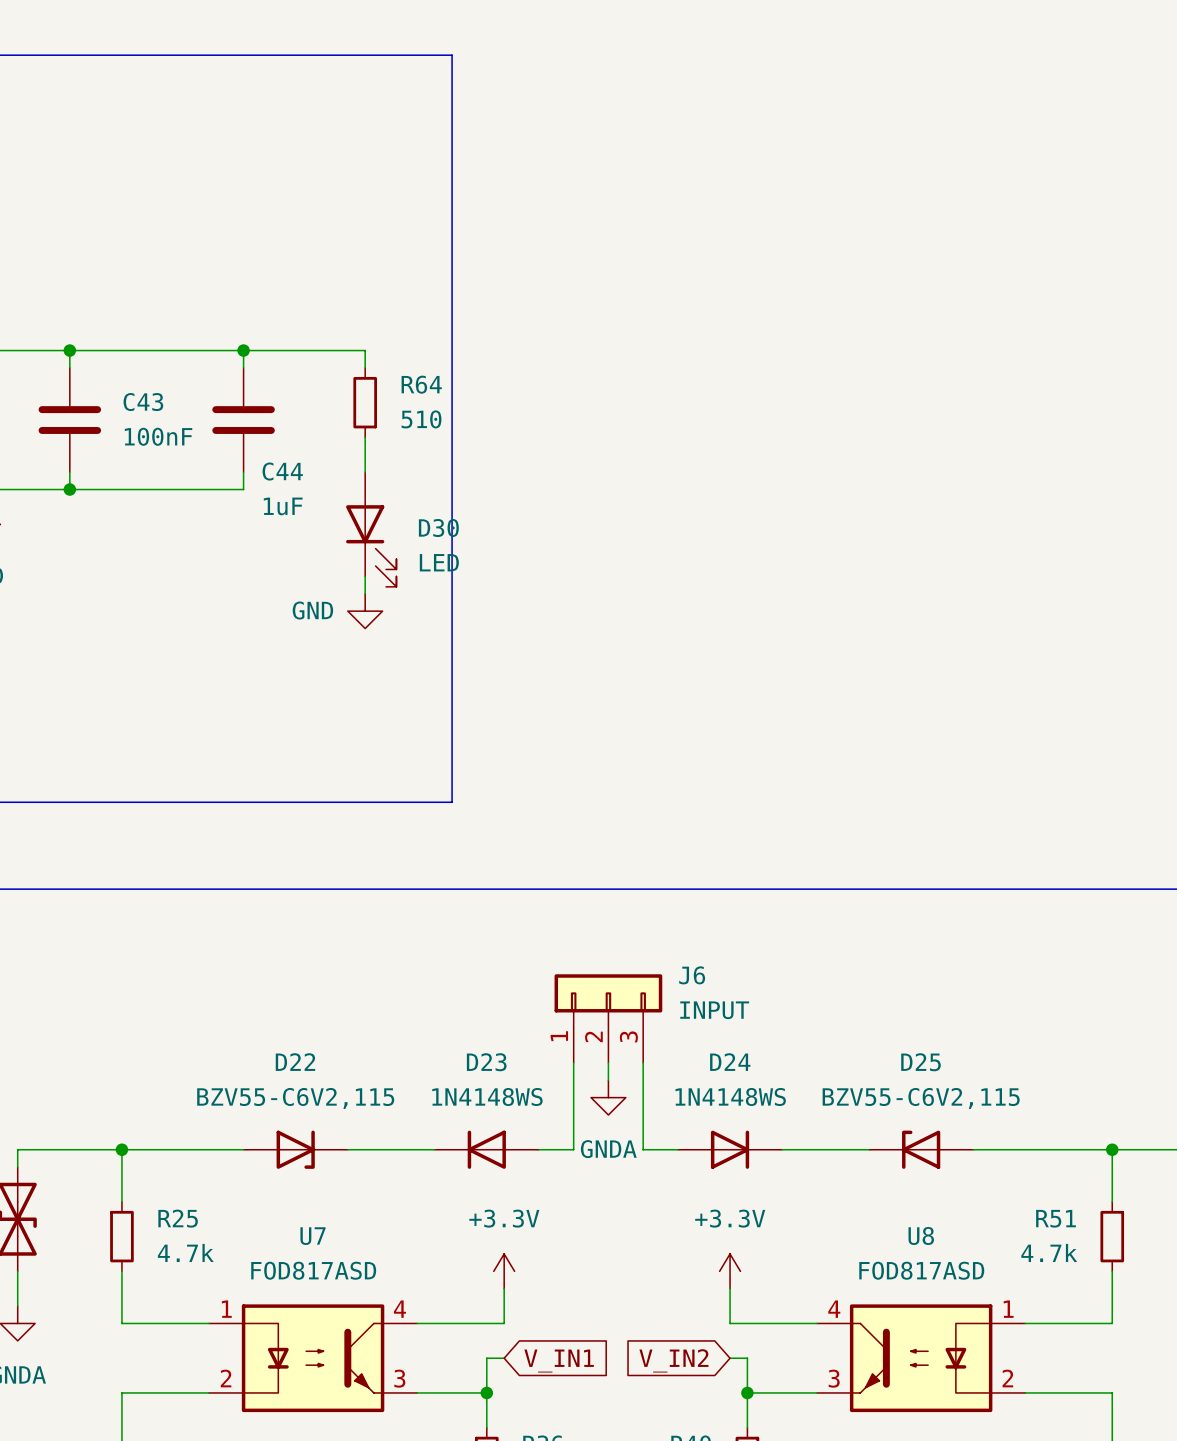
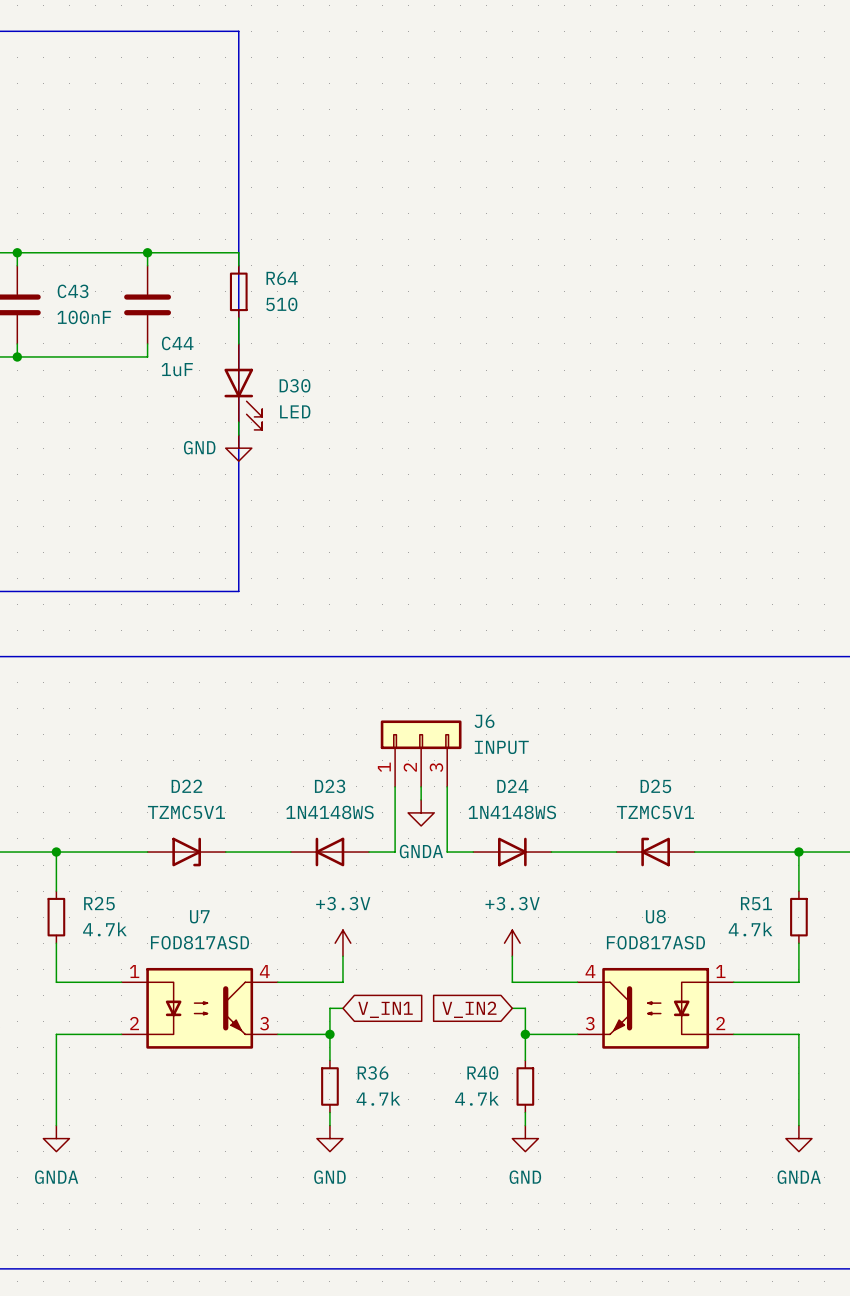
line: (365, 55) (452, 55) (452, 802) (365, 802) -> (238, 31) (238, 591)
D22 value: BZV55-C6V2,115 (295, 1098) -> TZMC5V1 (186, 812)
D25 value: BZV55-C6V2,115 (921, 1098) -> TZMC5V1 (655, 812)

